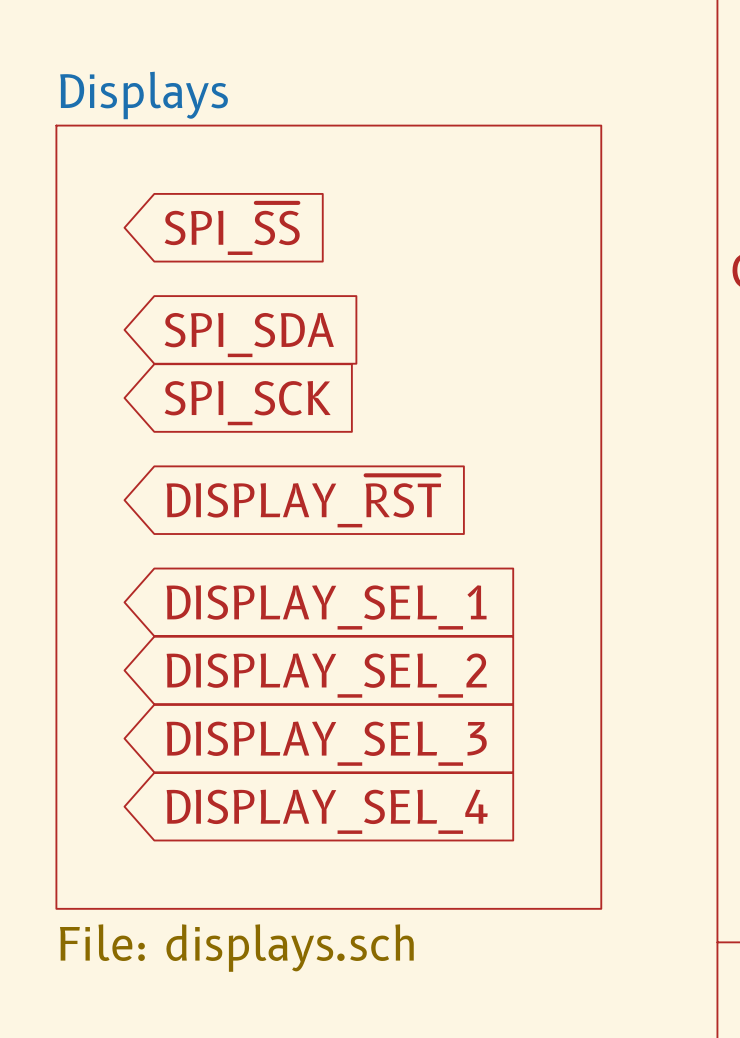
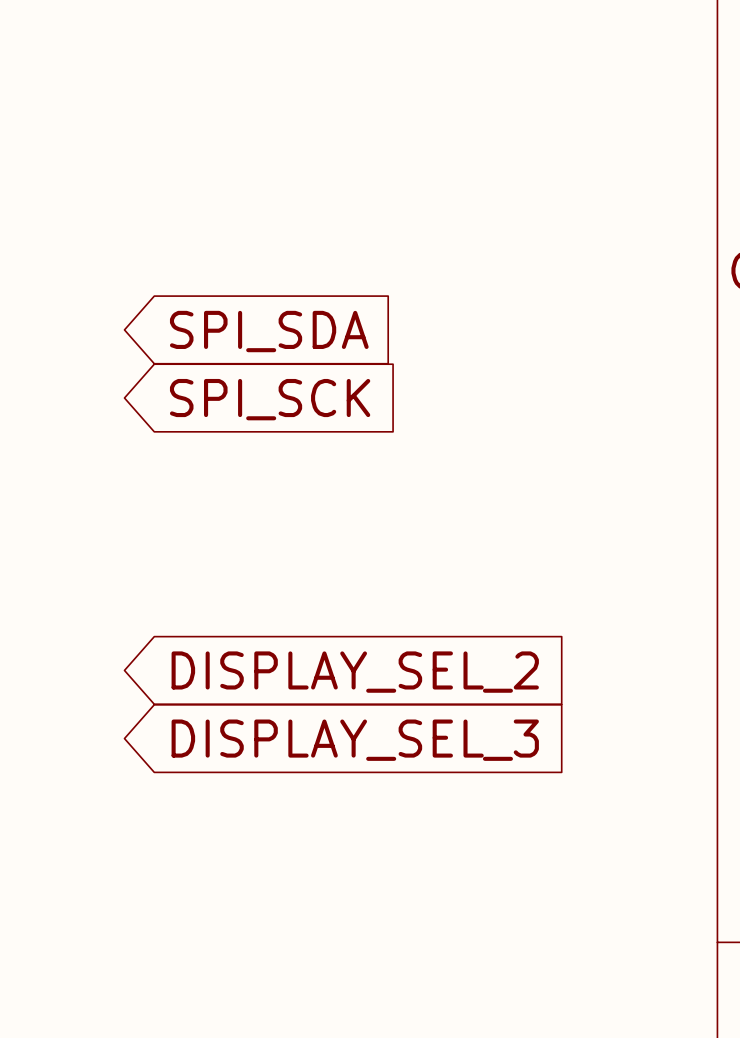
global label: SPI_~{SS} (232, 228) -> none
global label: DISPLAY_~{RST} (303, 501) -> none
sheet Displays: File: displays.sch (328, 517) -> none
global label: DISPLAY_SEL_1 (326, 607) -> none
global label: DISPLAY_SEL_4 (327, 811) -> none

